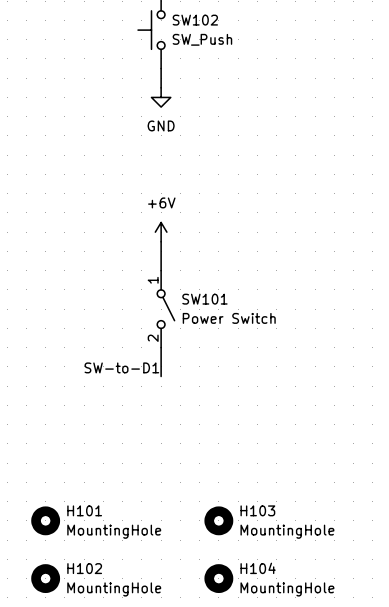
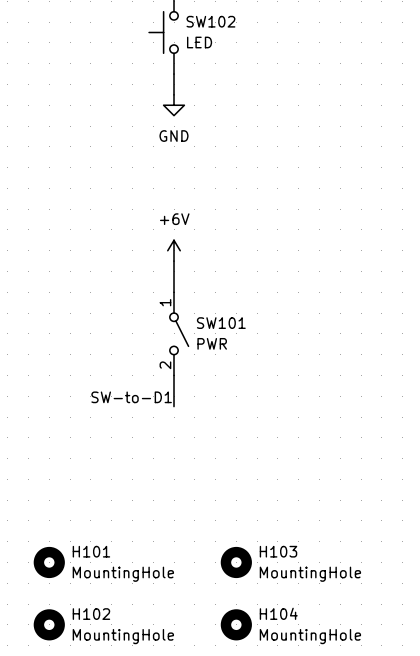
SW102 value: SW_Push (202, 39) -> LED (199, 42)
SW101 value: Power Switch (229, 318) -> PWR (212, 343)

